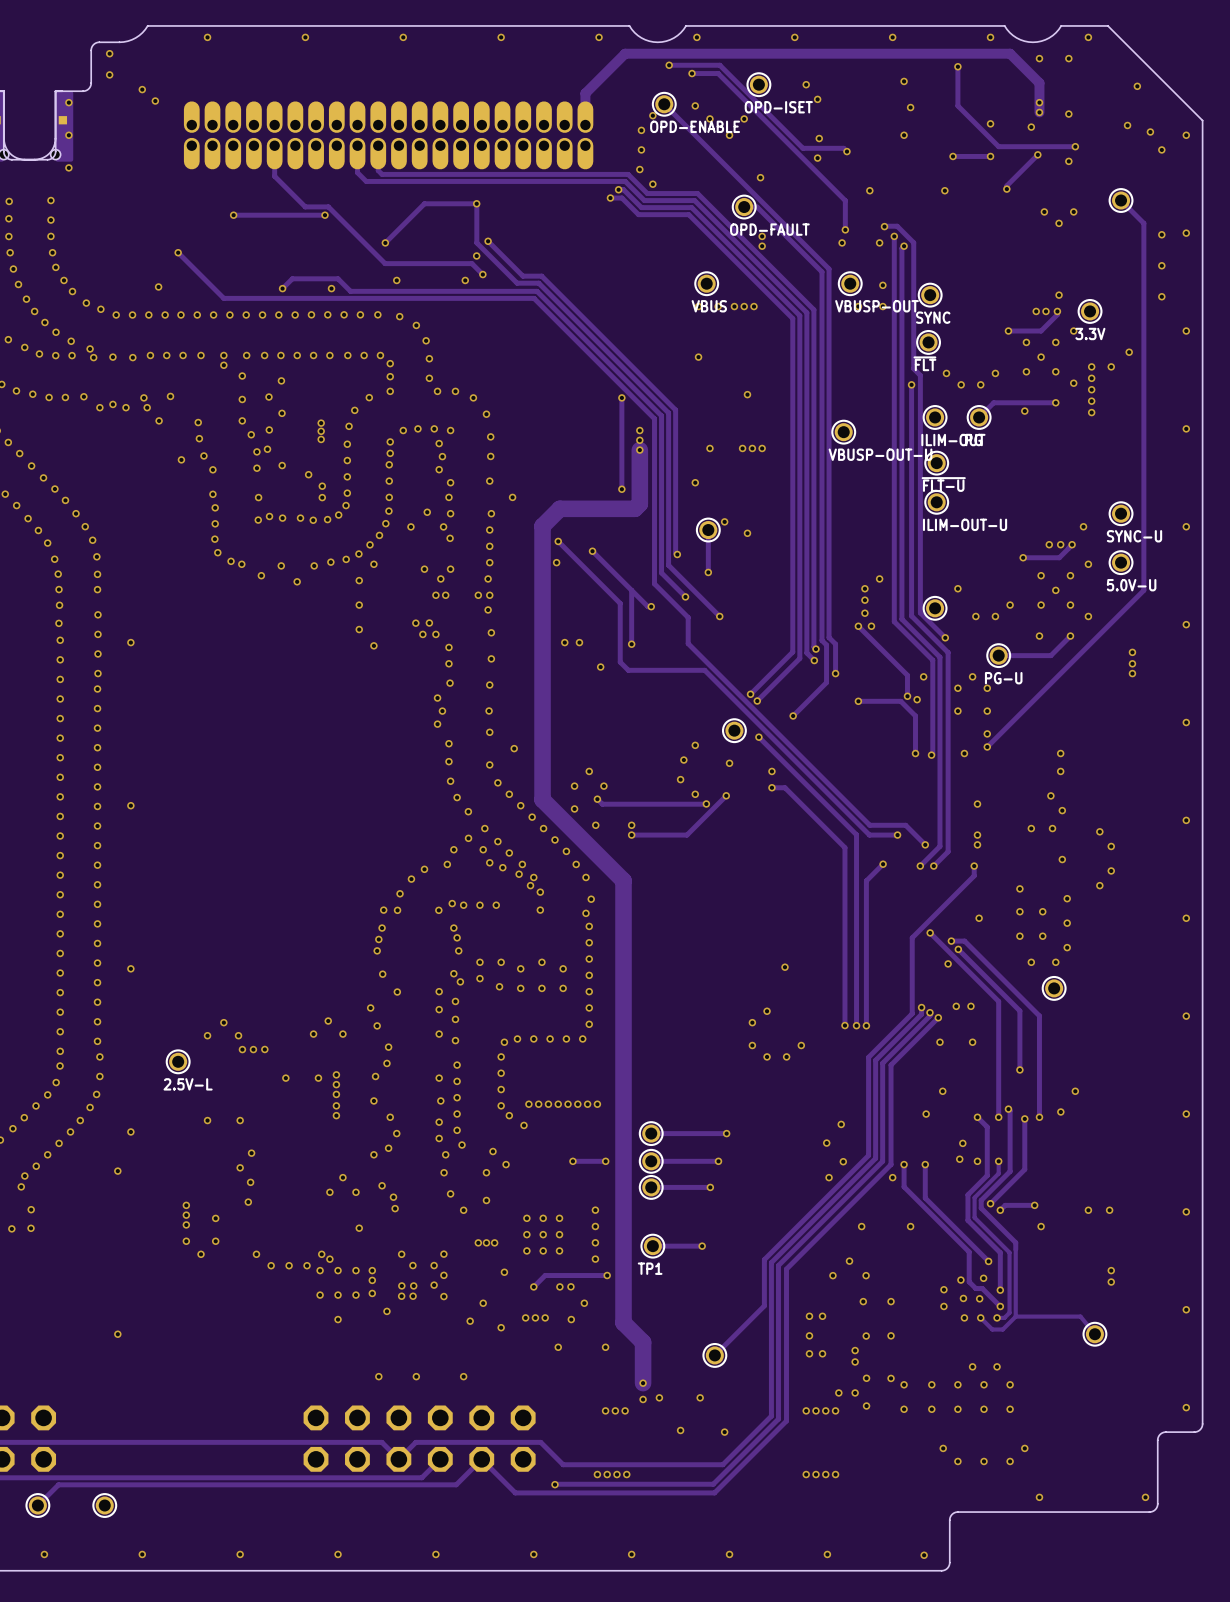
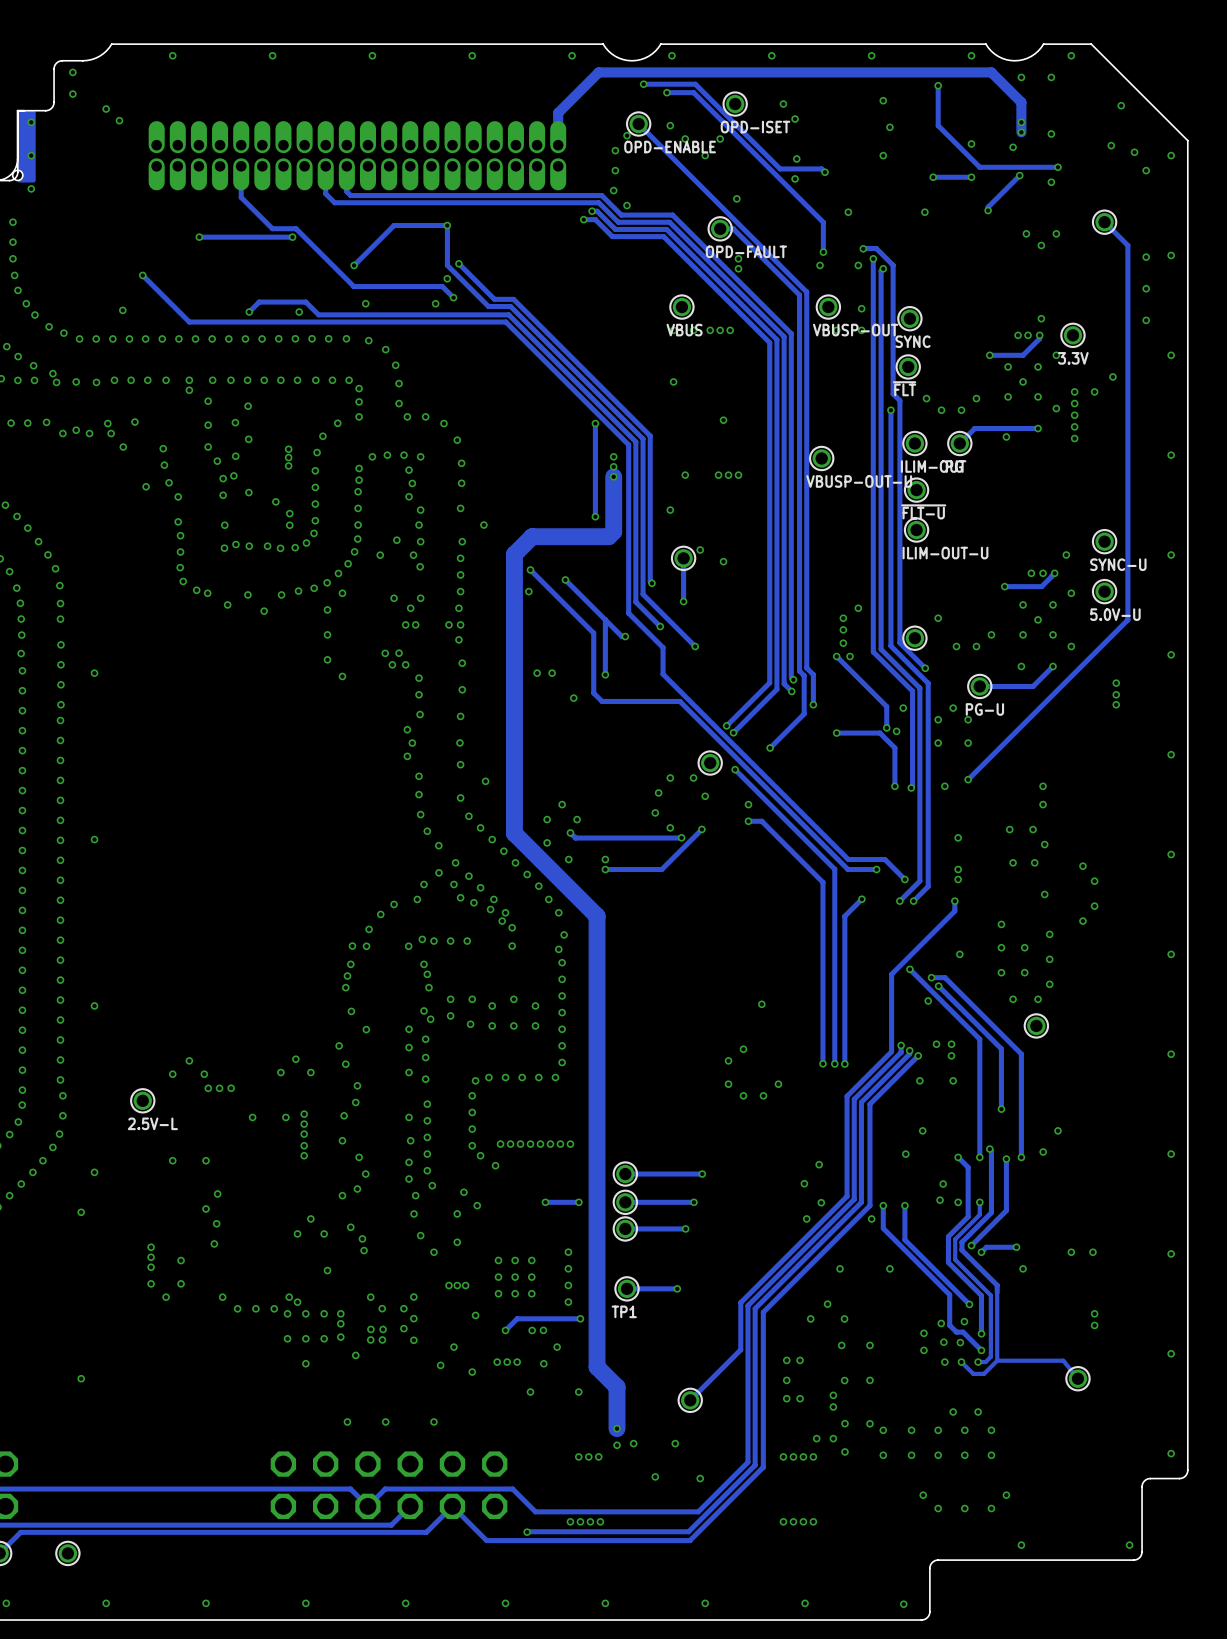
via position: (987, 733) -> (1009, 829)
via: none -> (693, 777)
via: none -> (951, 1055)

